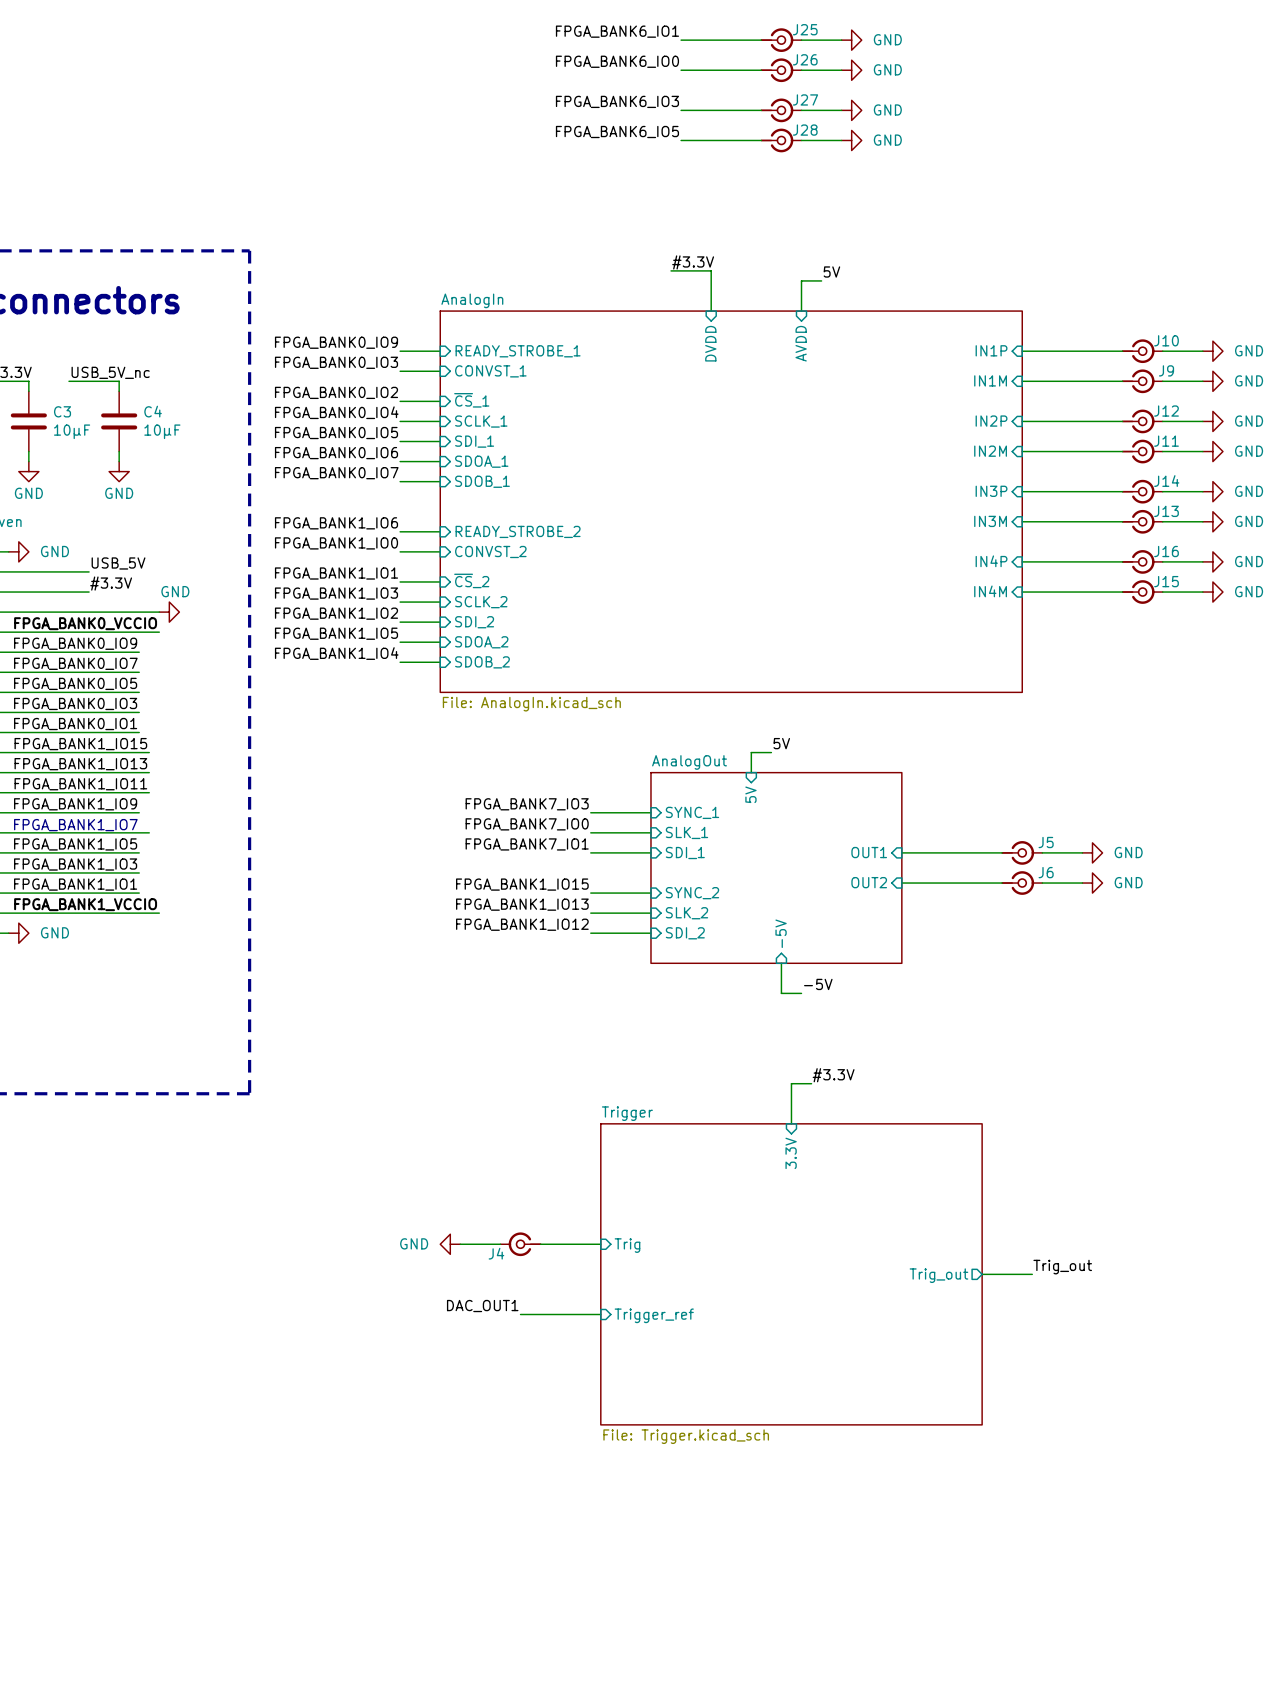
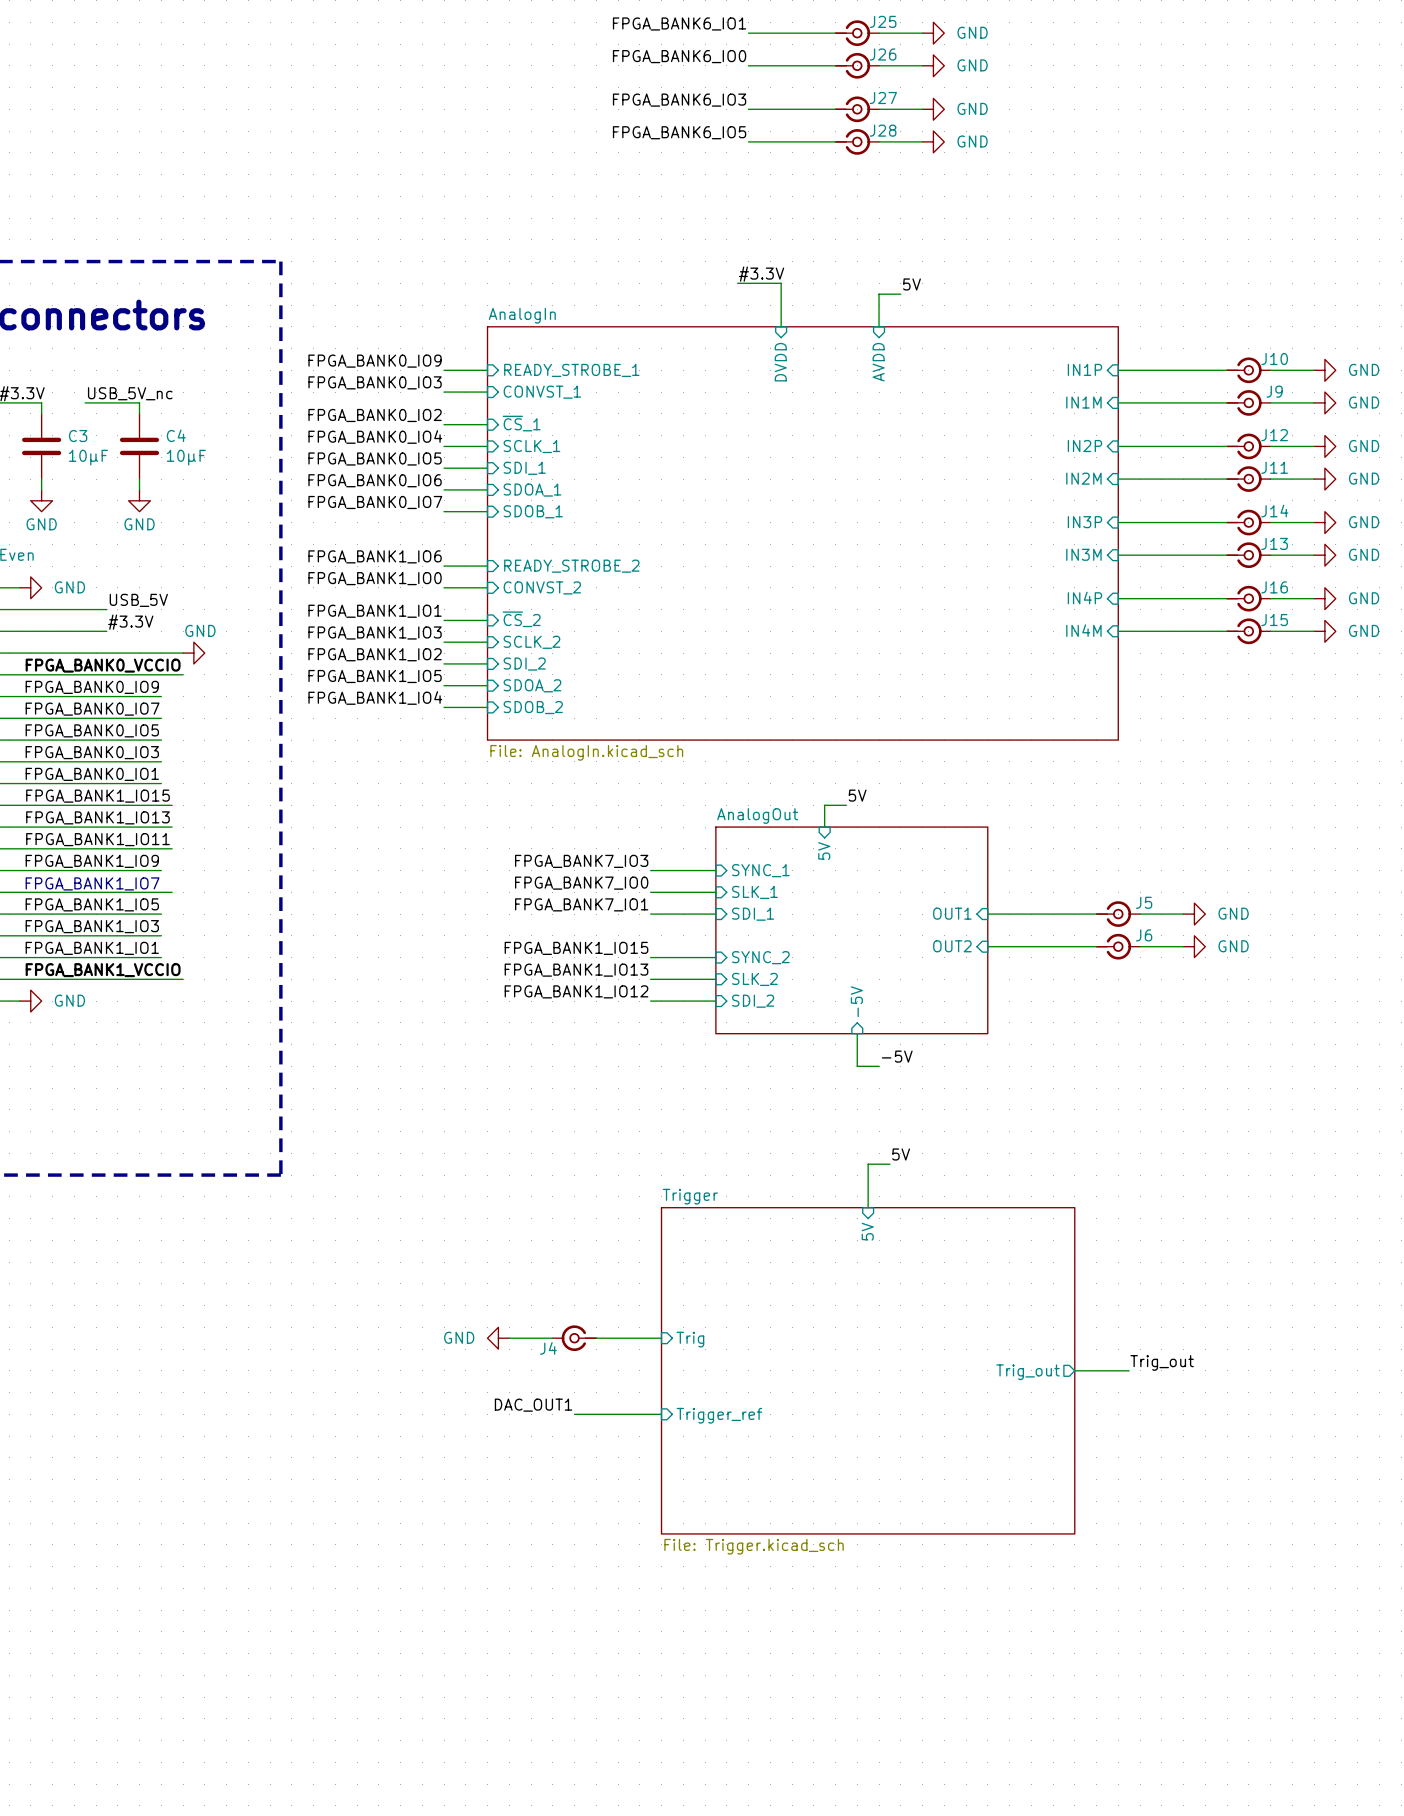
label: #3.3V (833, 1075) -> 5V (901, 1154)
sheet pin: 3.3V (791, 1153) -> 5V (867, 1231)

